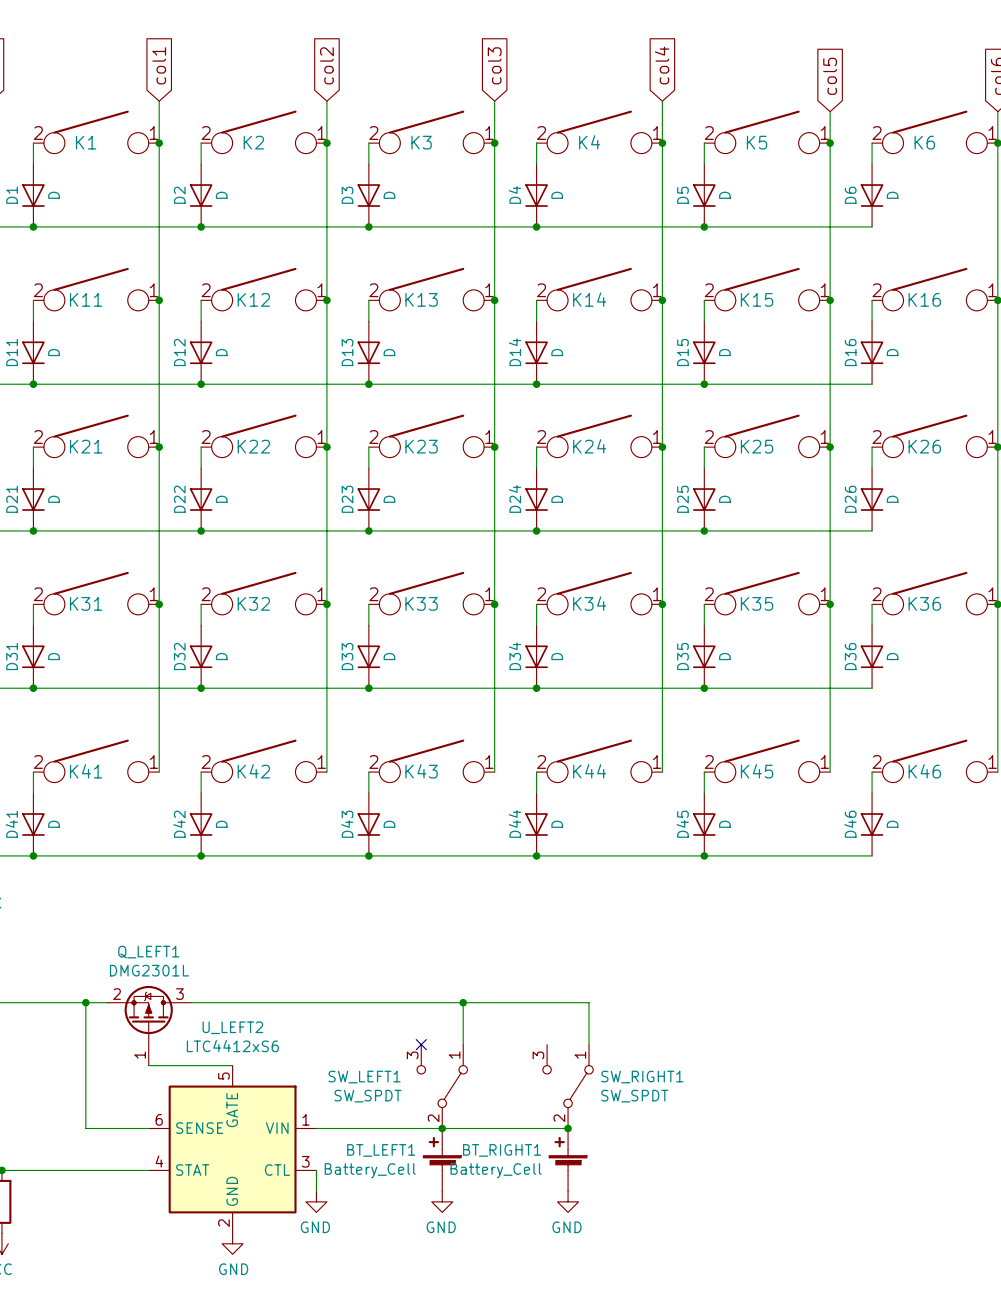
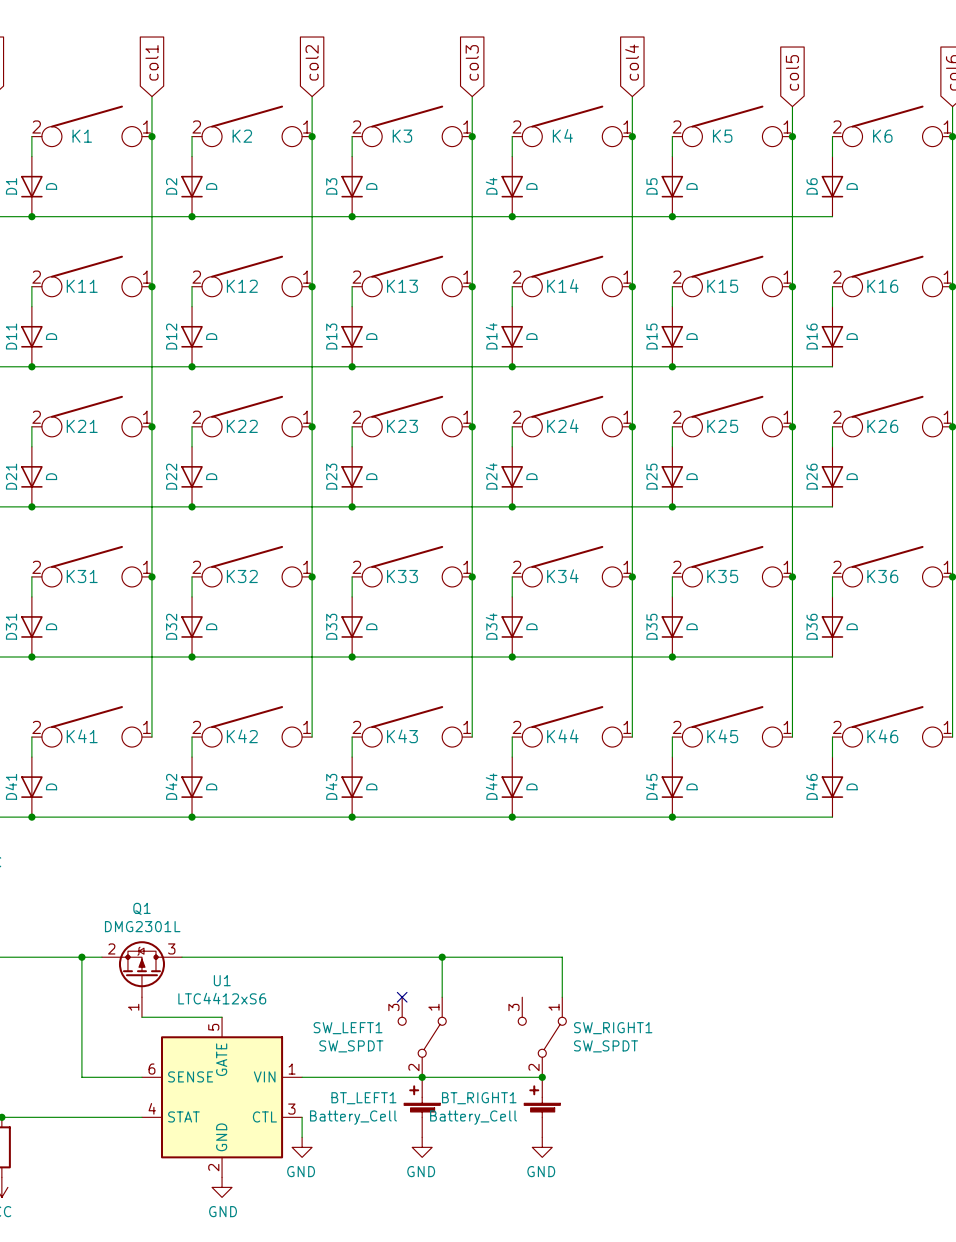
Q_LEFT1 name: Q_LEFT1 (148, 952) -> Q1 (141, 908)
U_LEFT2 name: U_LEFT2 (232, 1027) -> U1 (222, 980)

